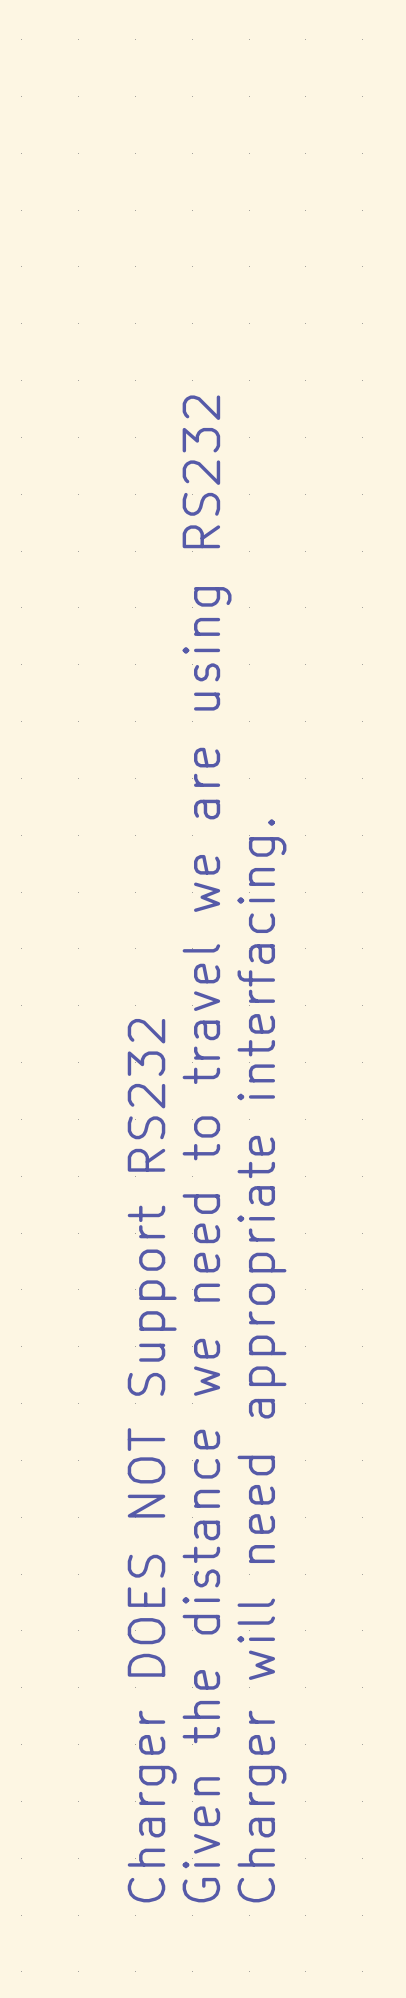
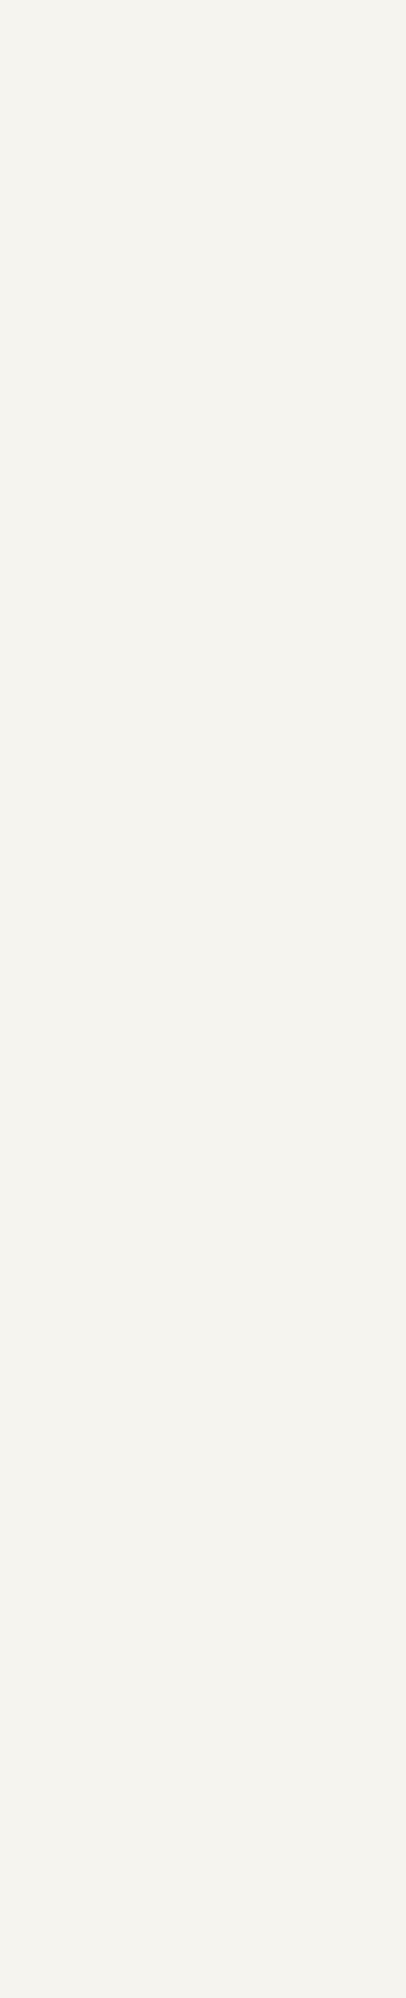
text: Given the distance we need to travel we are using RS232 (207, 1148) -> none
text: Charger will need appropriate interfacing. (261, 1360) -> none
text: Charger DOES NOT Support RS232 (152, 1460) -> none

